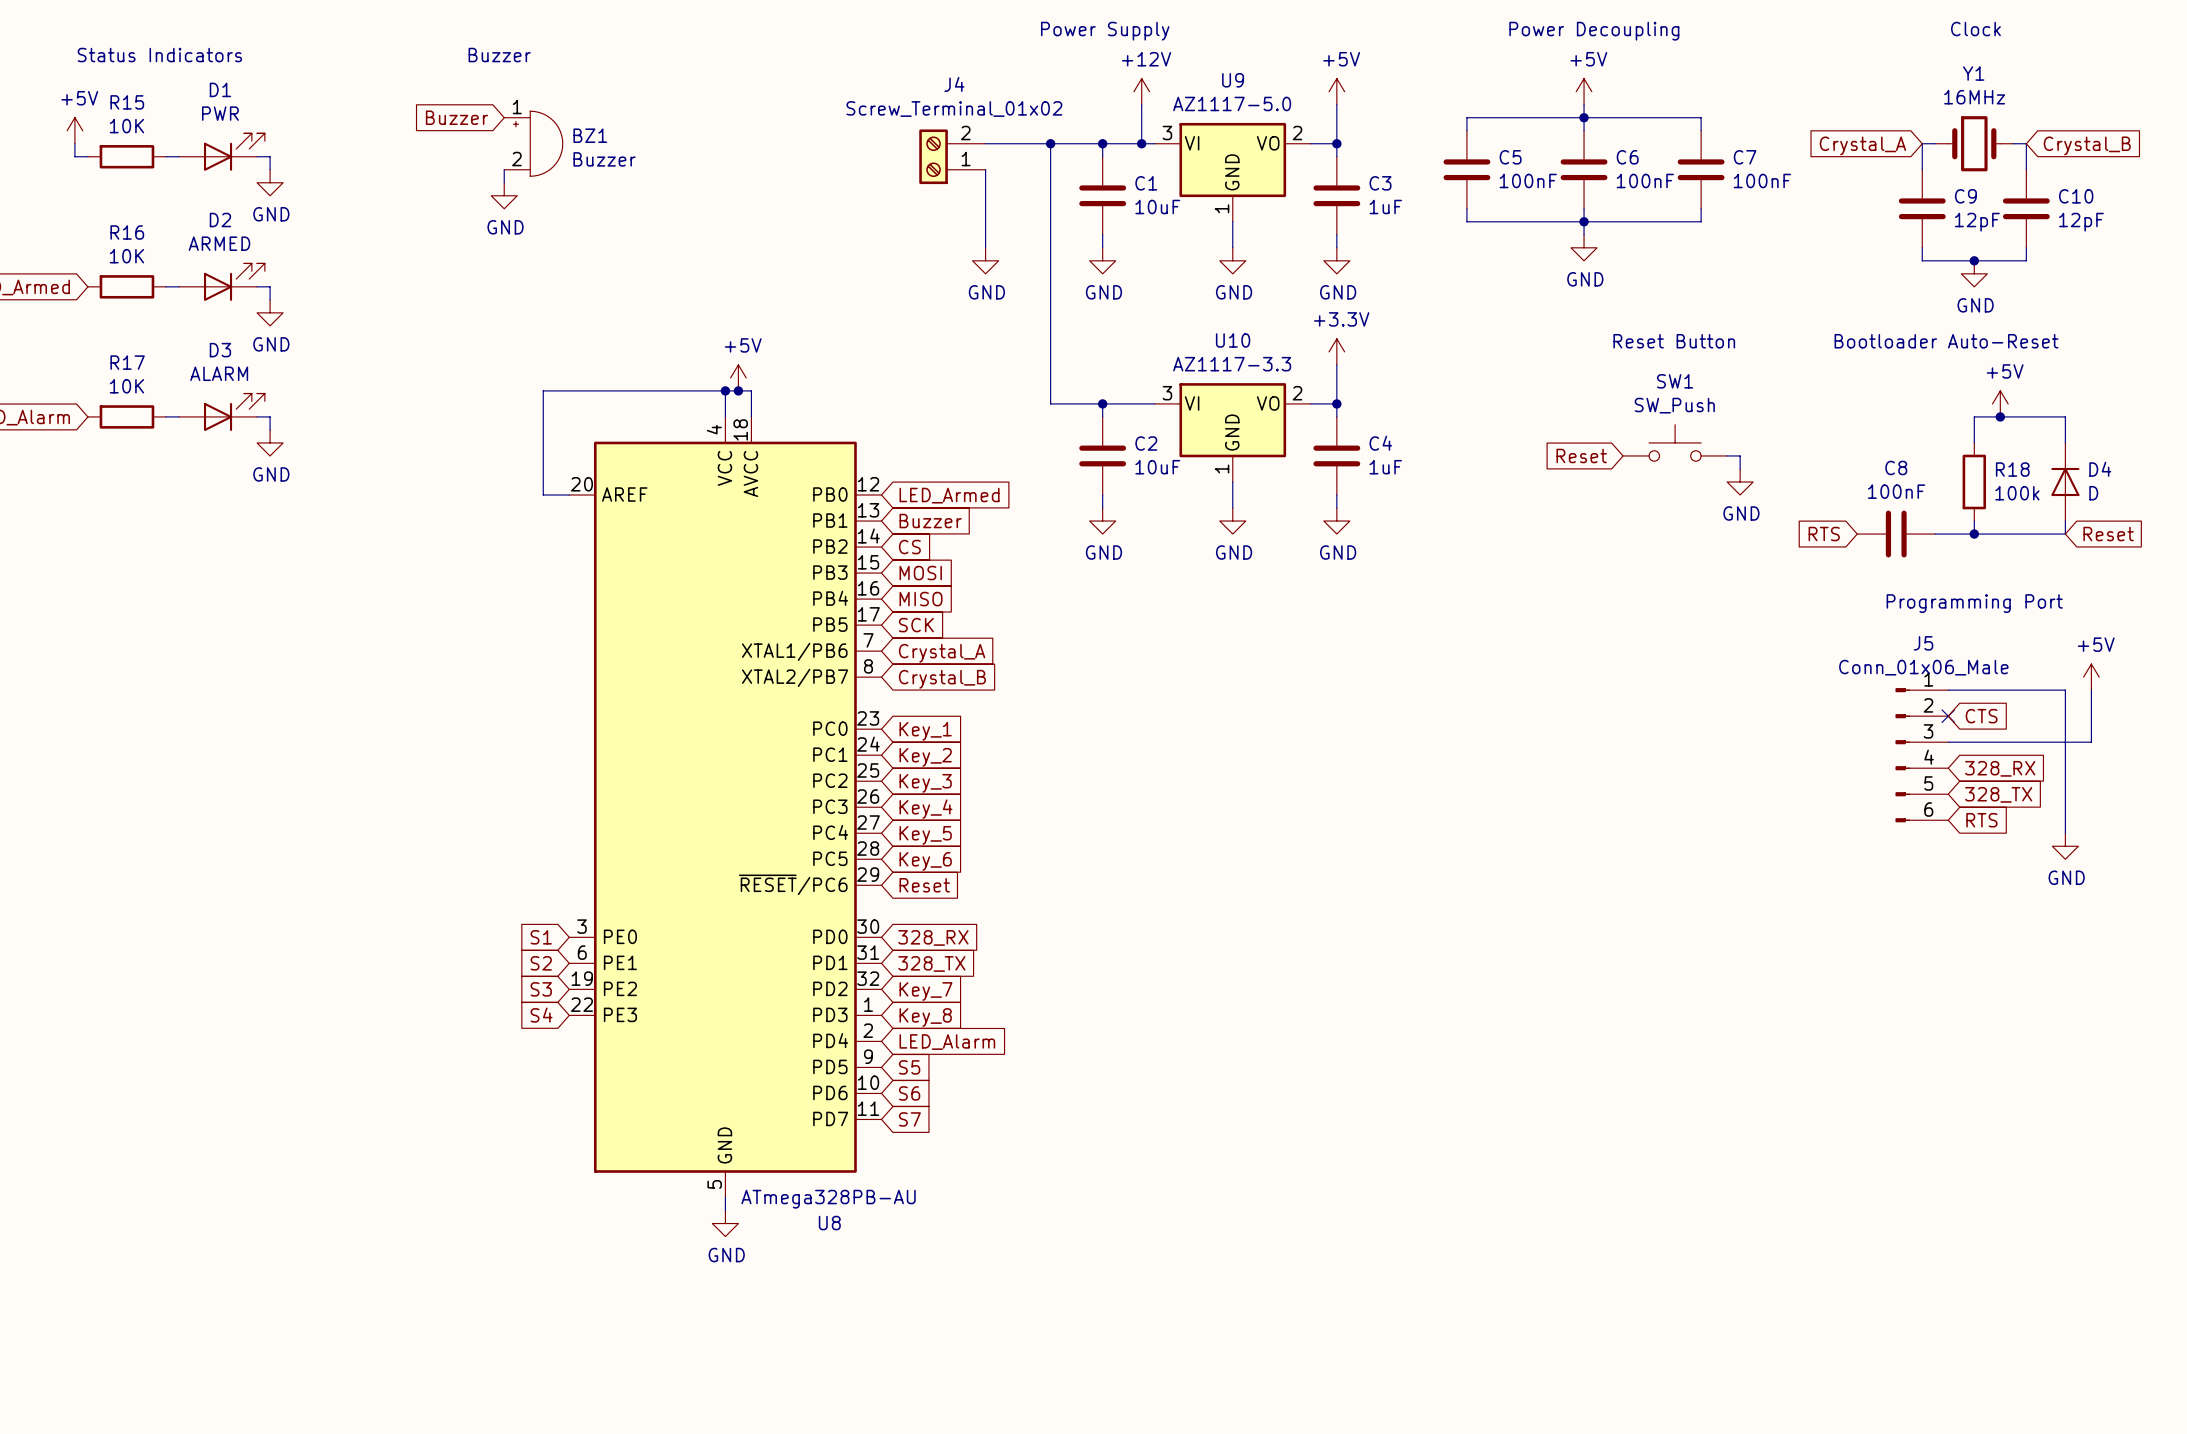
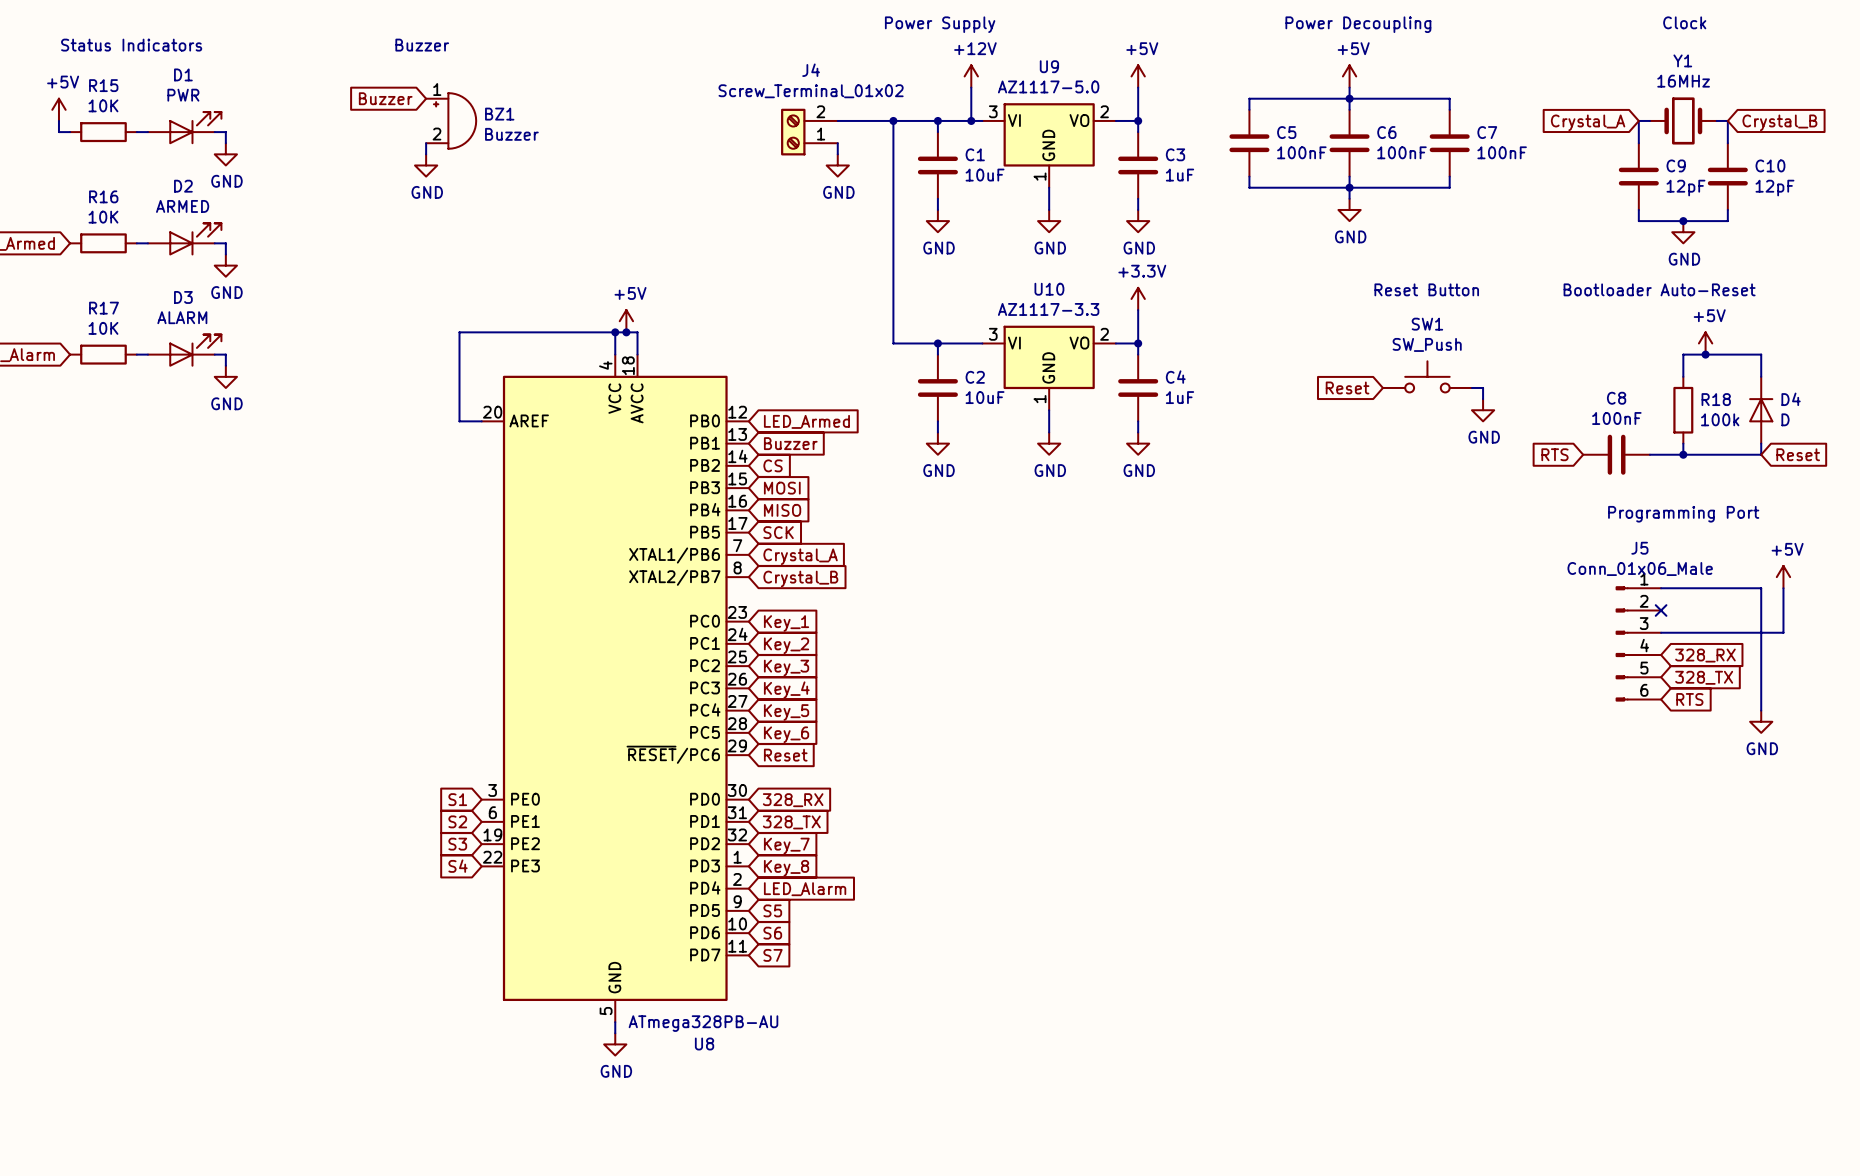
wire: (985, 182) (985, 247) -> none
power symbol position: GND (985, 260) -> GND (837, 165)
global label: CTS (1981, 716) -> none

